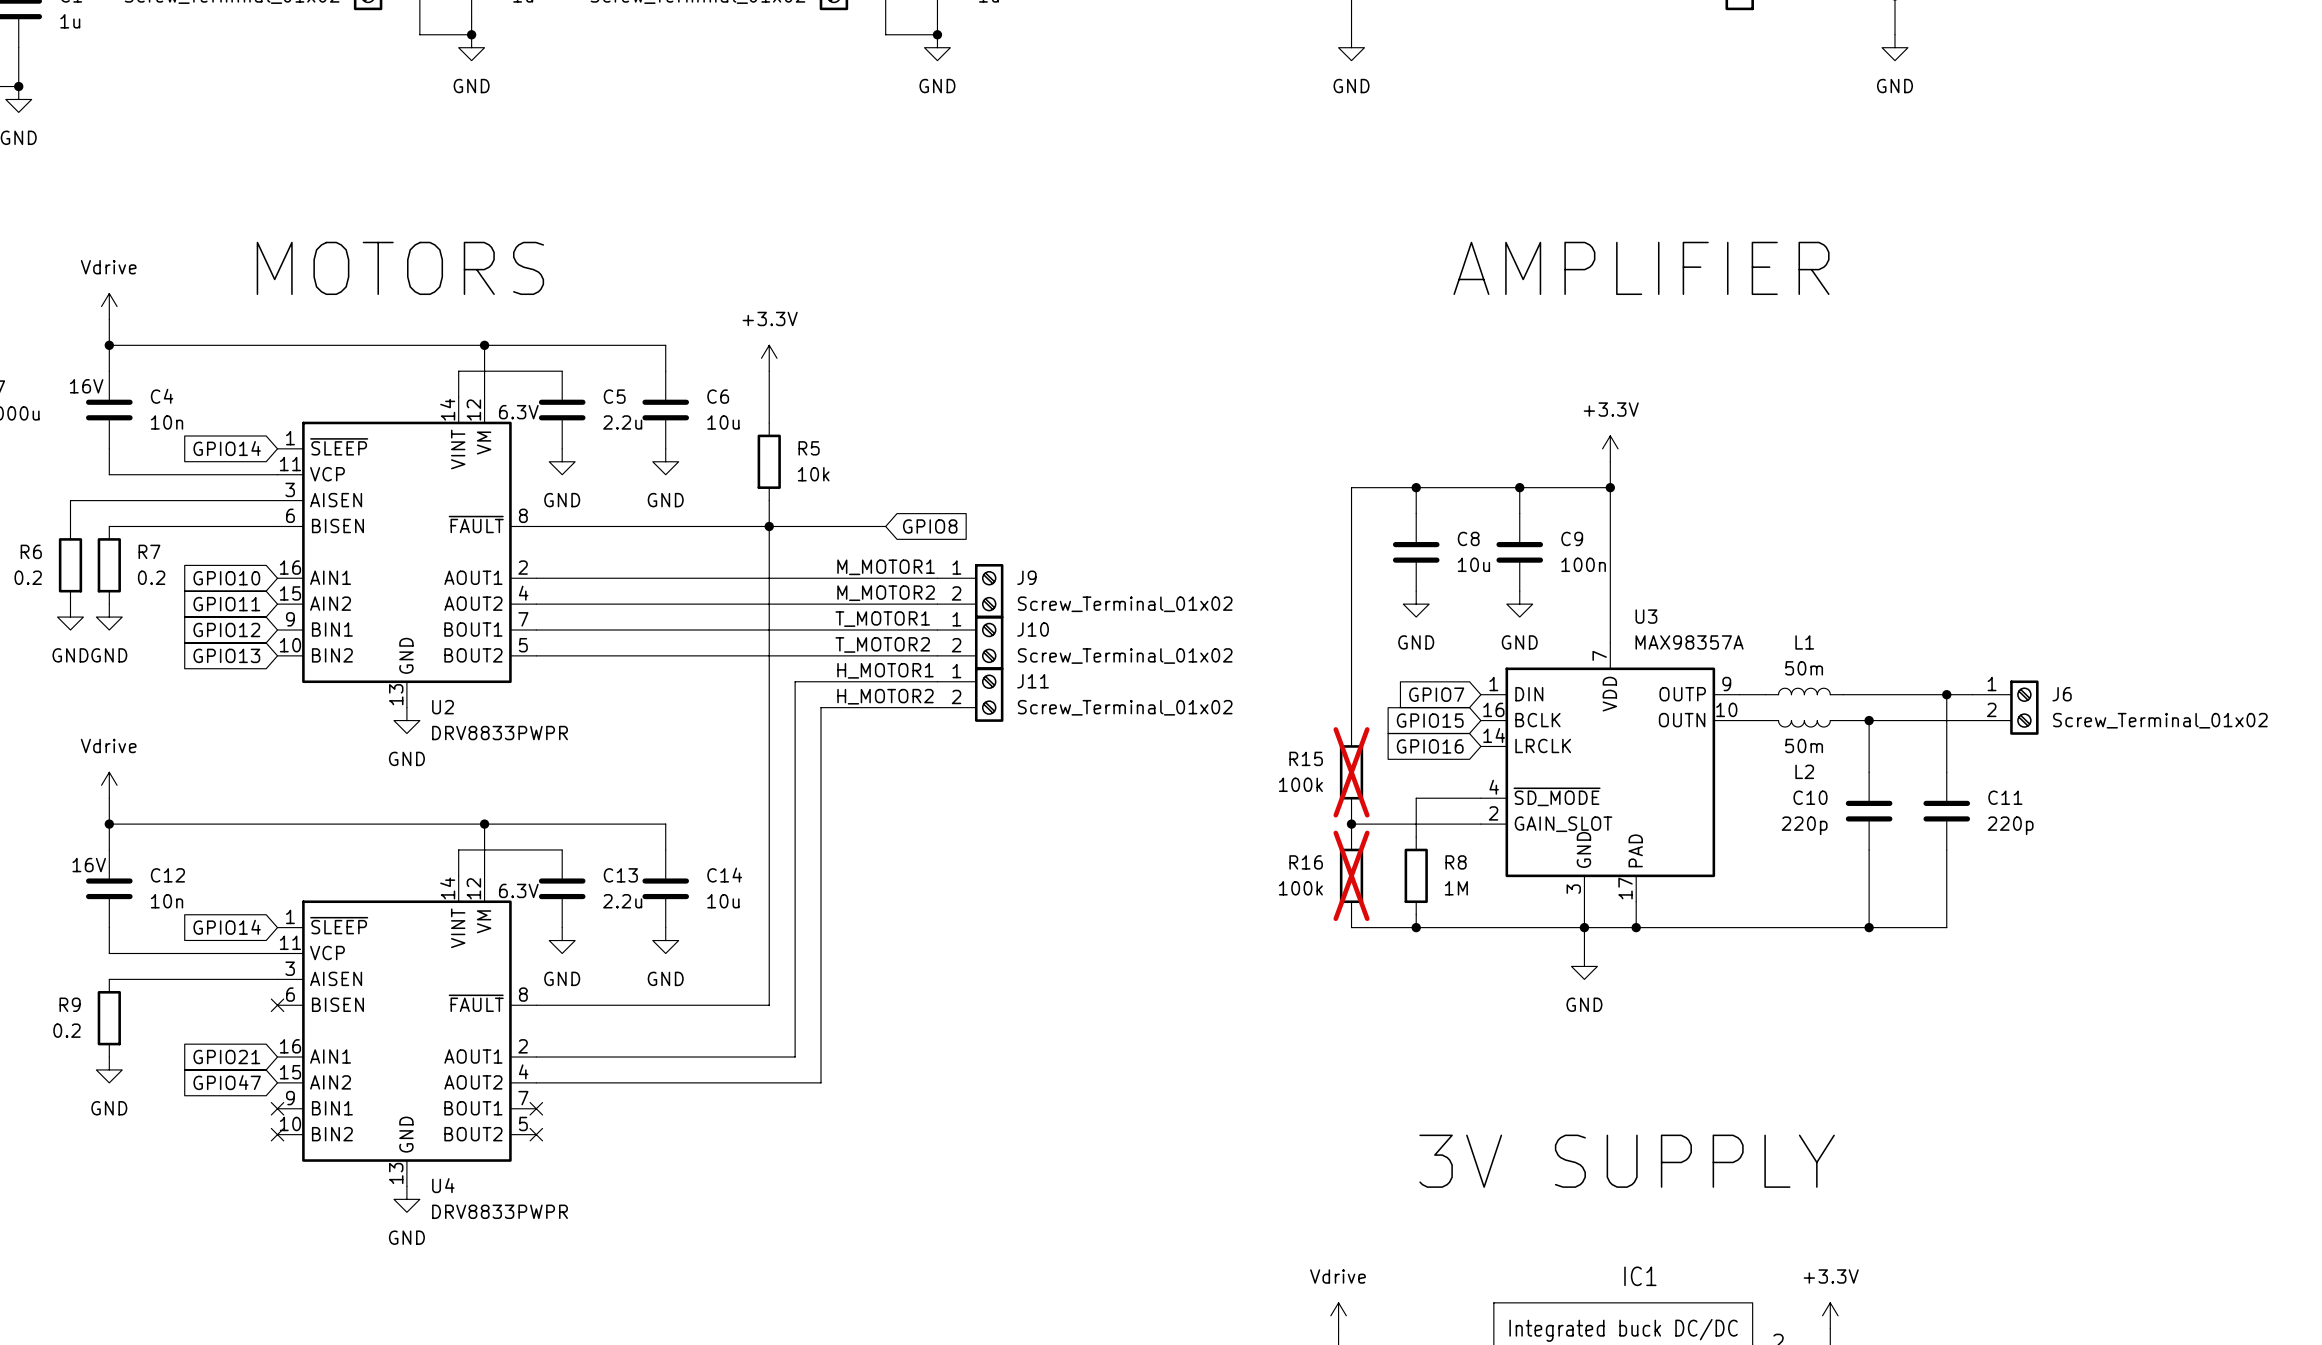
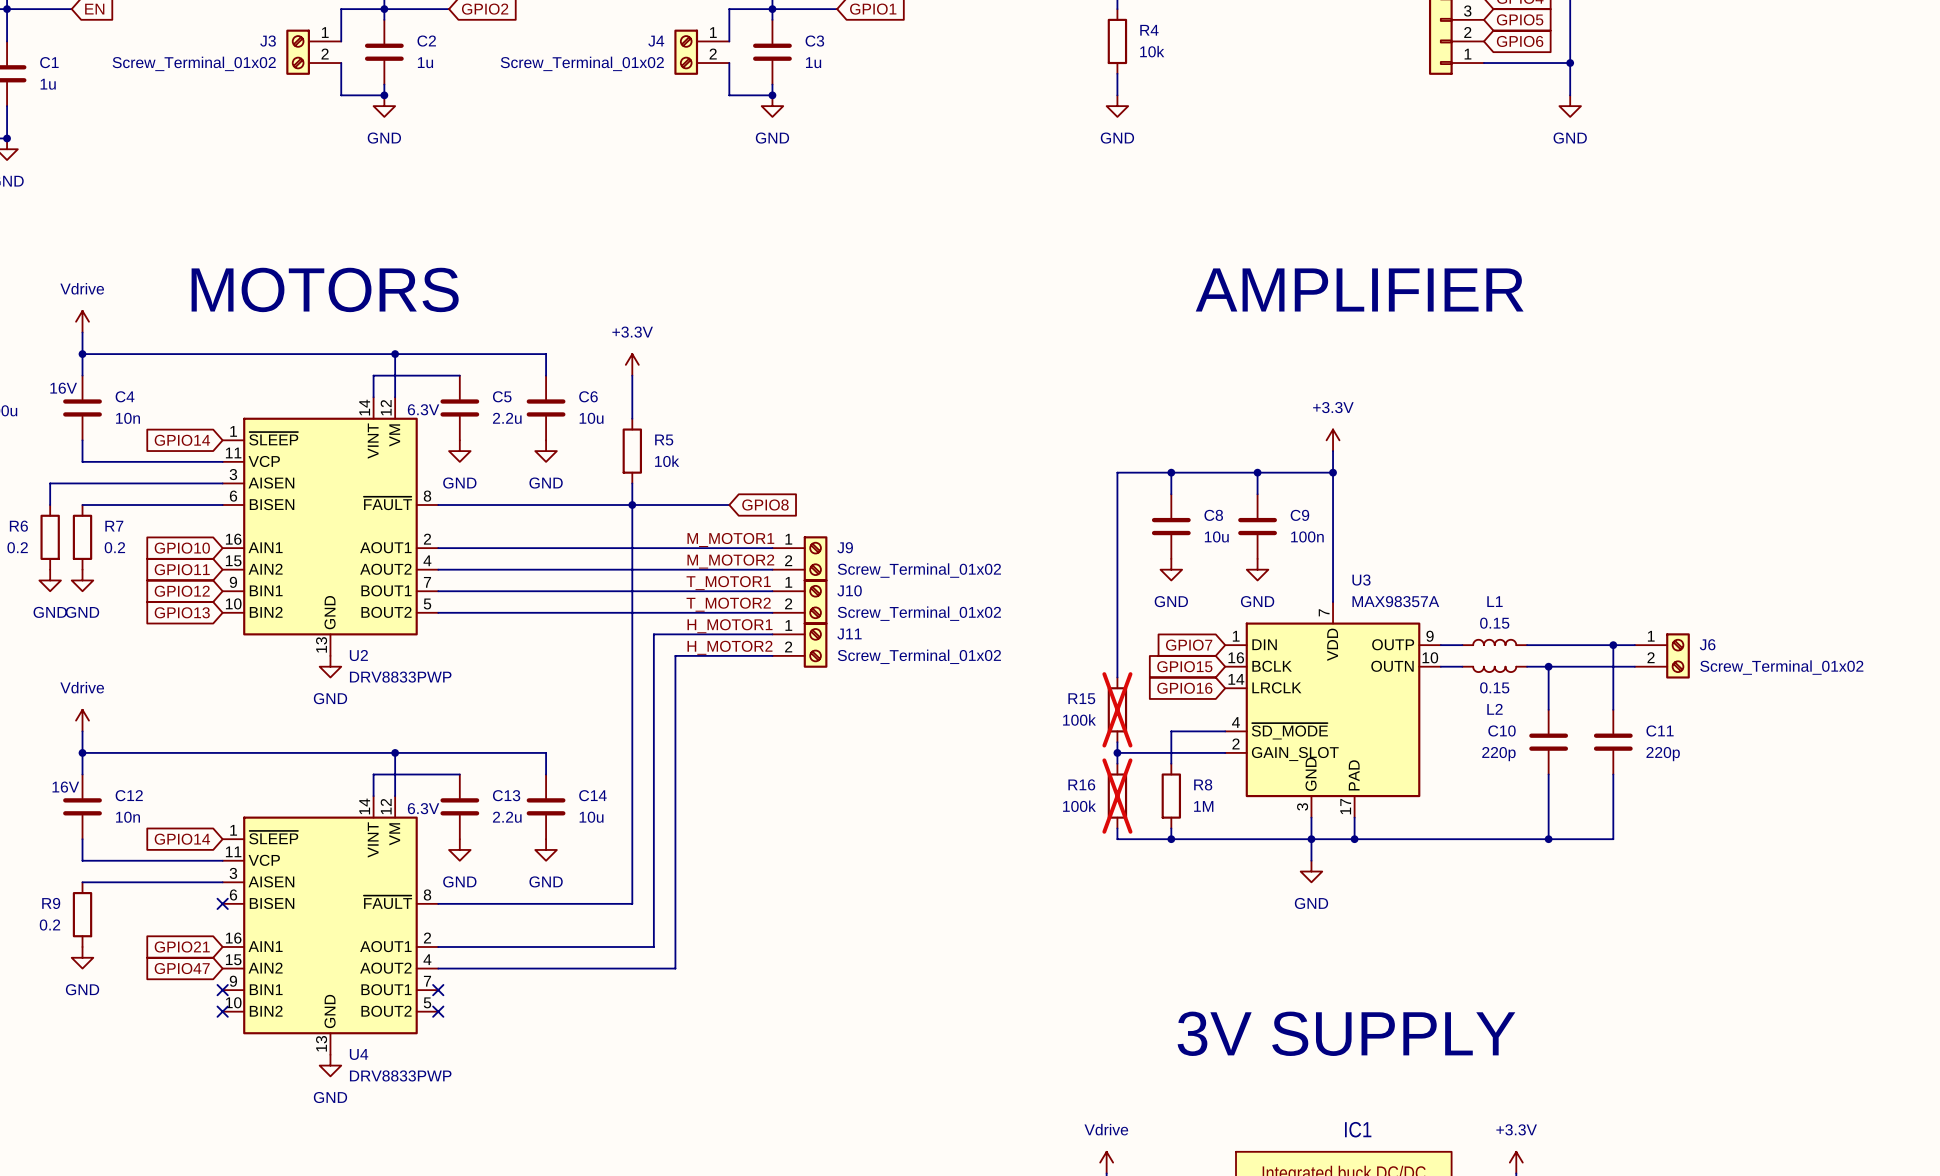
L1 value: 50m (1804, 668) -> 0.15 (1494, 623)
U2 value: DRV8833PWPR (500, 733) -> DRV8833PWP (400, 677)
L2 value: 50m (1804, 745) -> 0.15 (1494, 687)
U4 value: DRV8833PWPR (500, 1211) -> DRV8833PWP (400, 1075)

